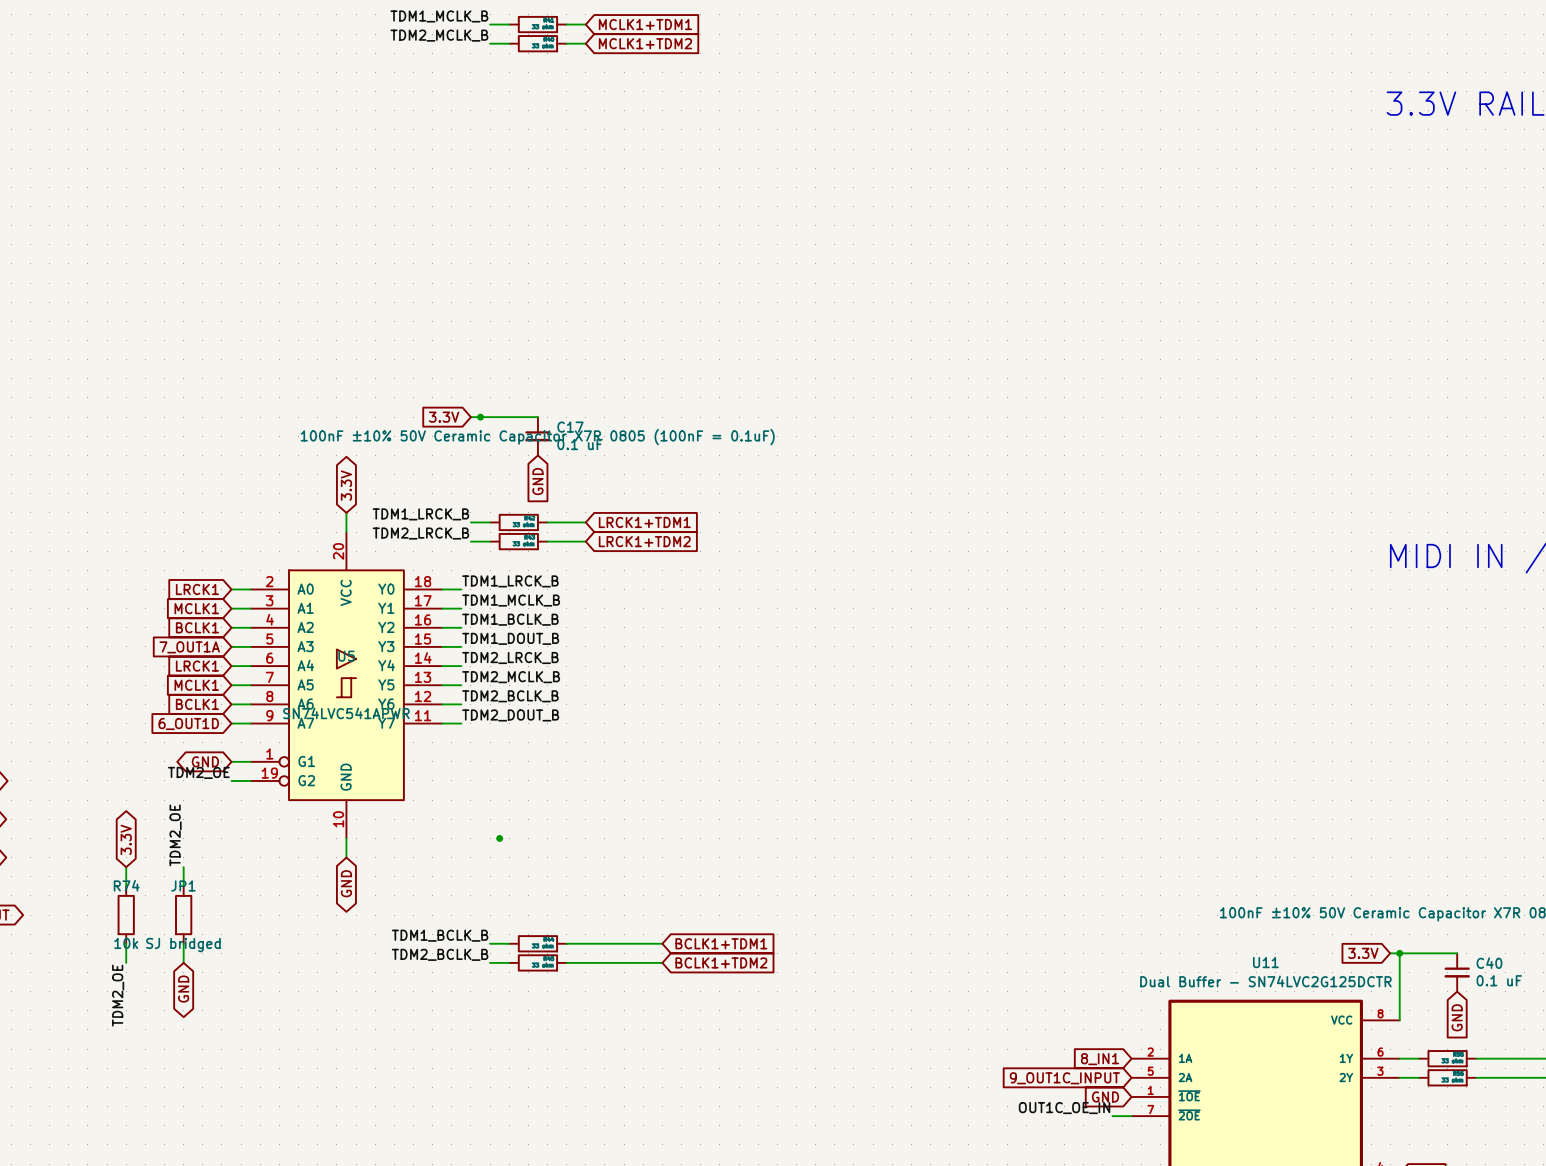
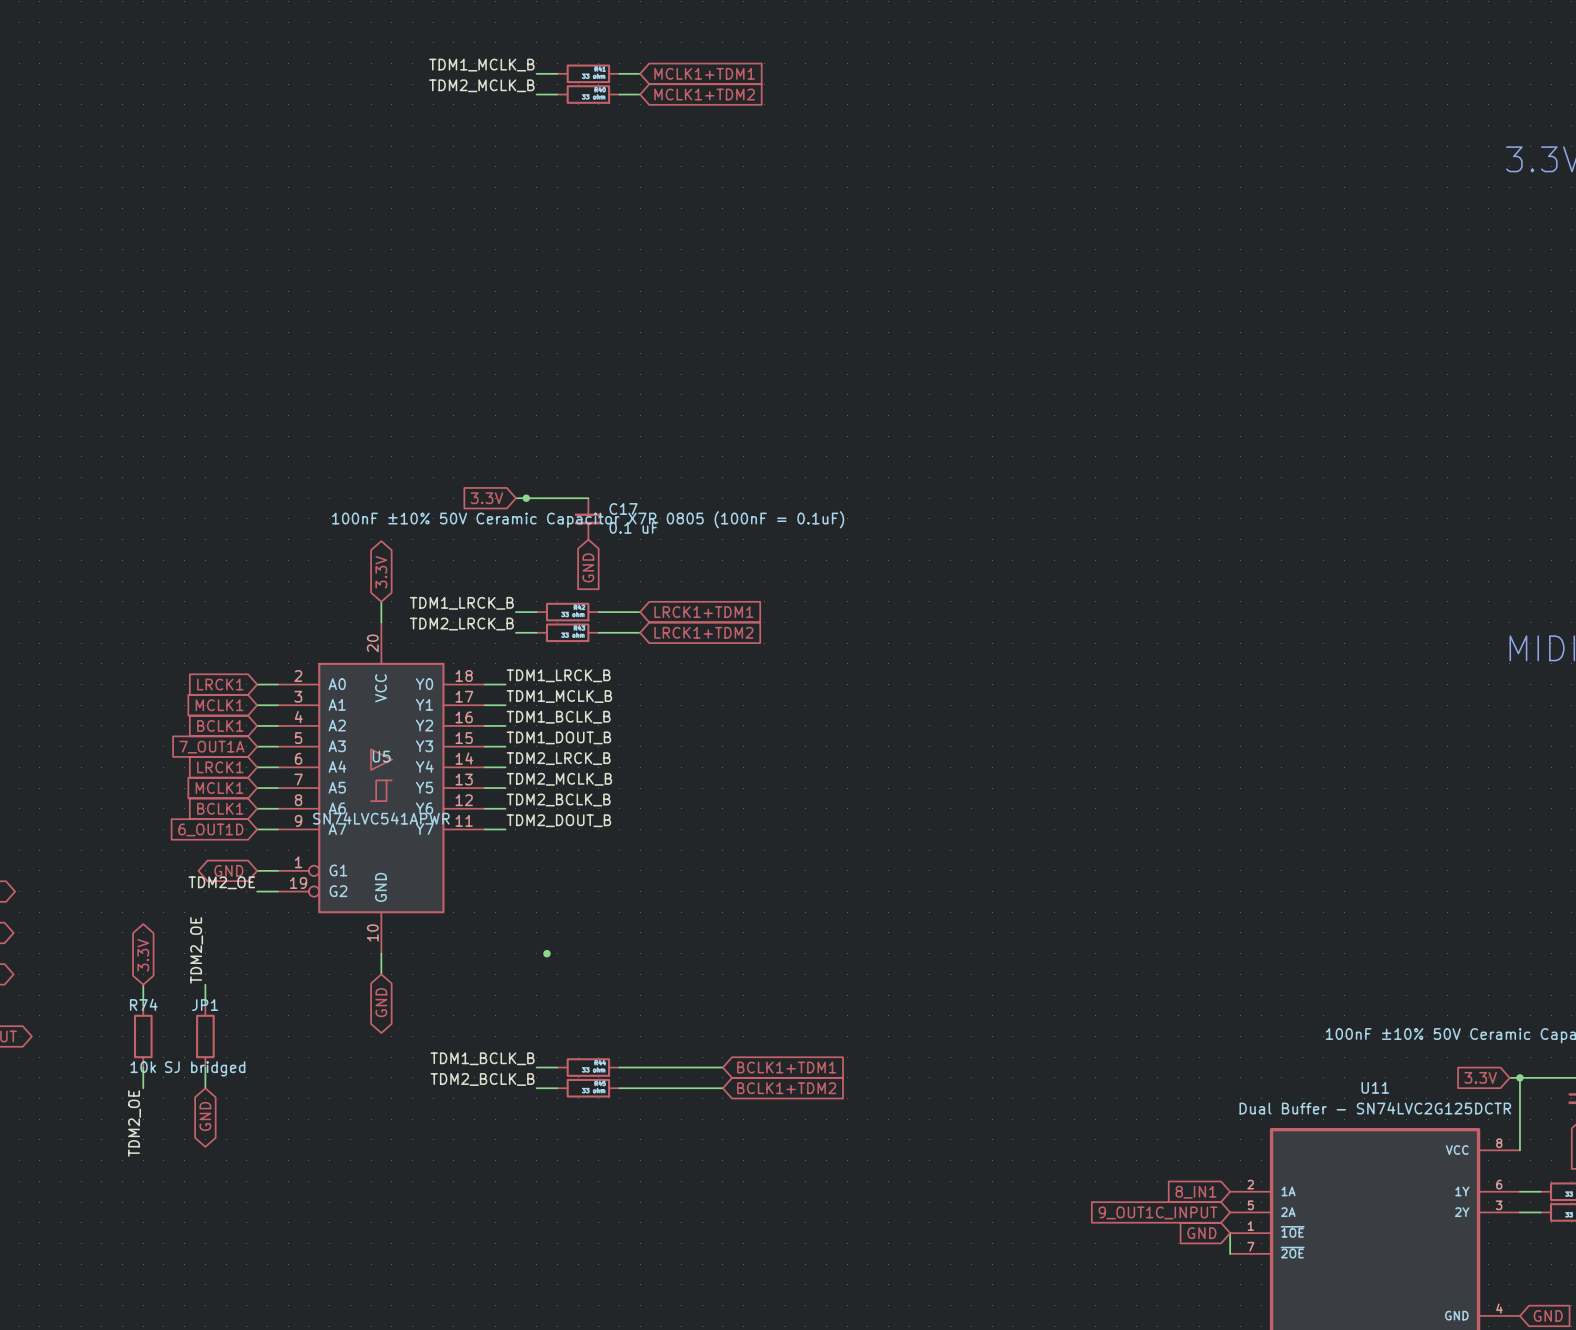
label: OUT1C_OE_IN (1064, 1108) -> none
wire: (1112, 1116) (1131, 1116) -> (1230, 1233) (1230, 1253)

